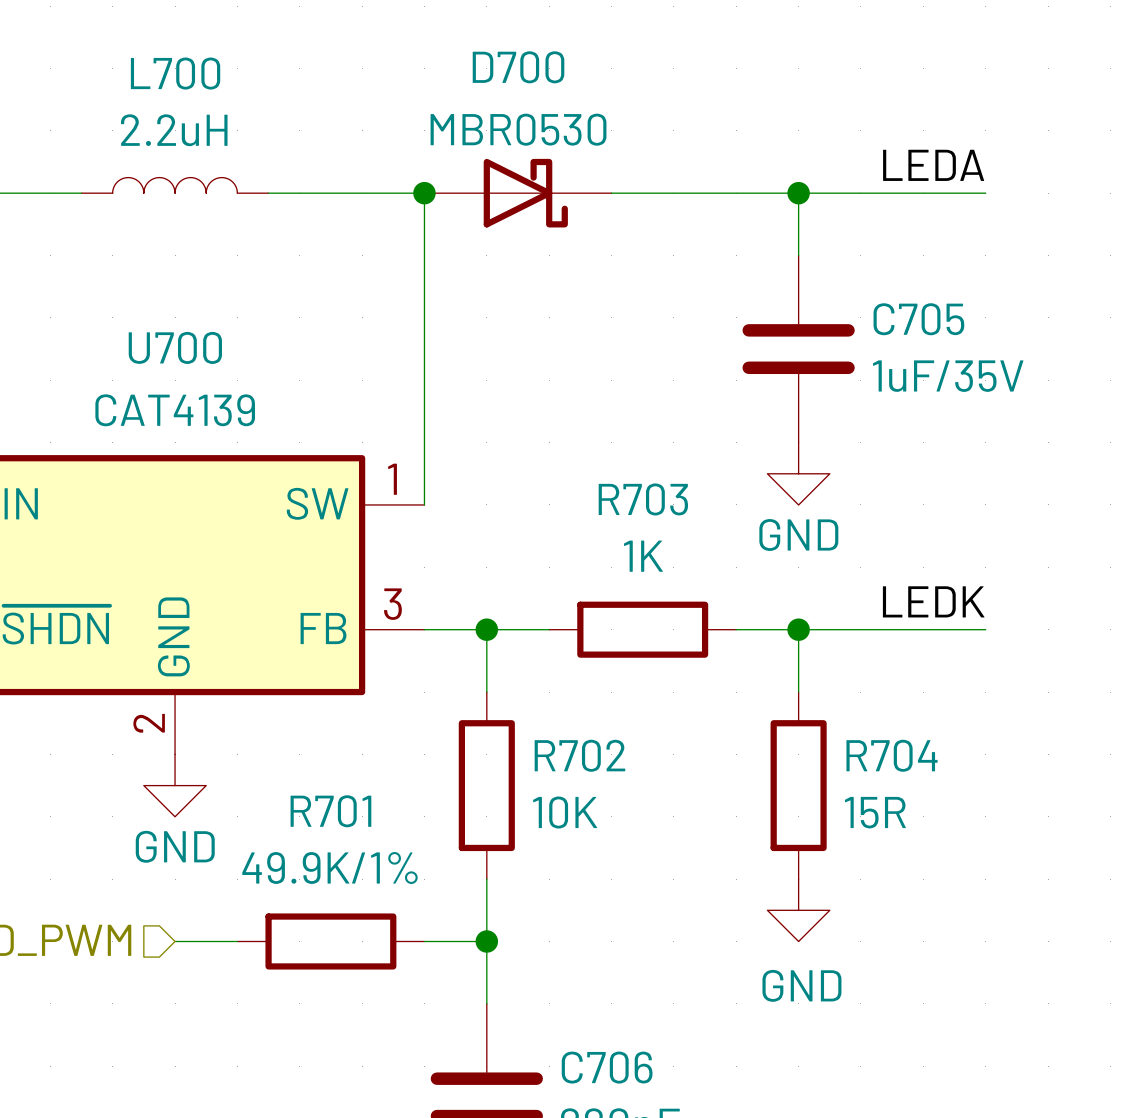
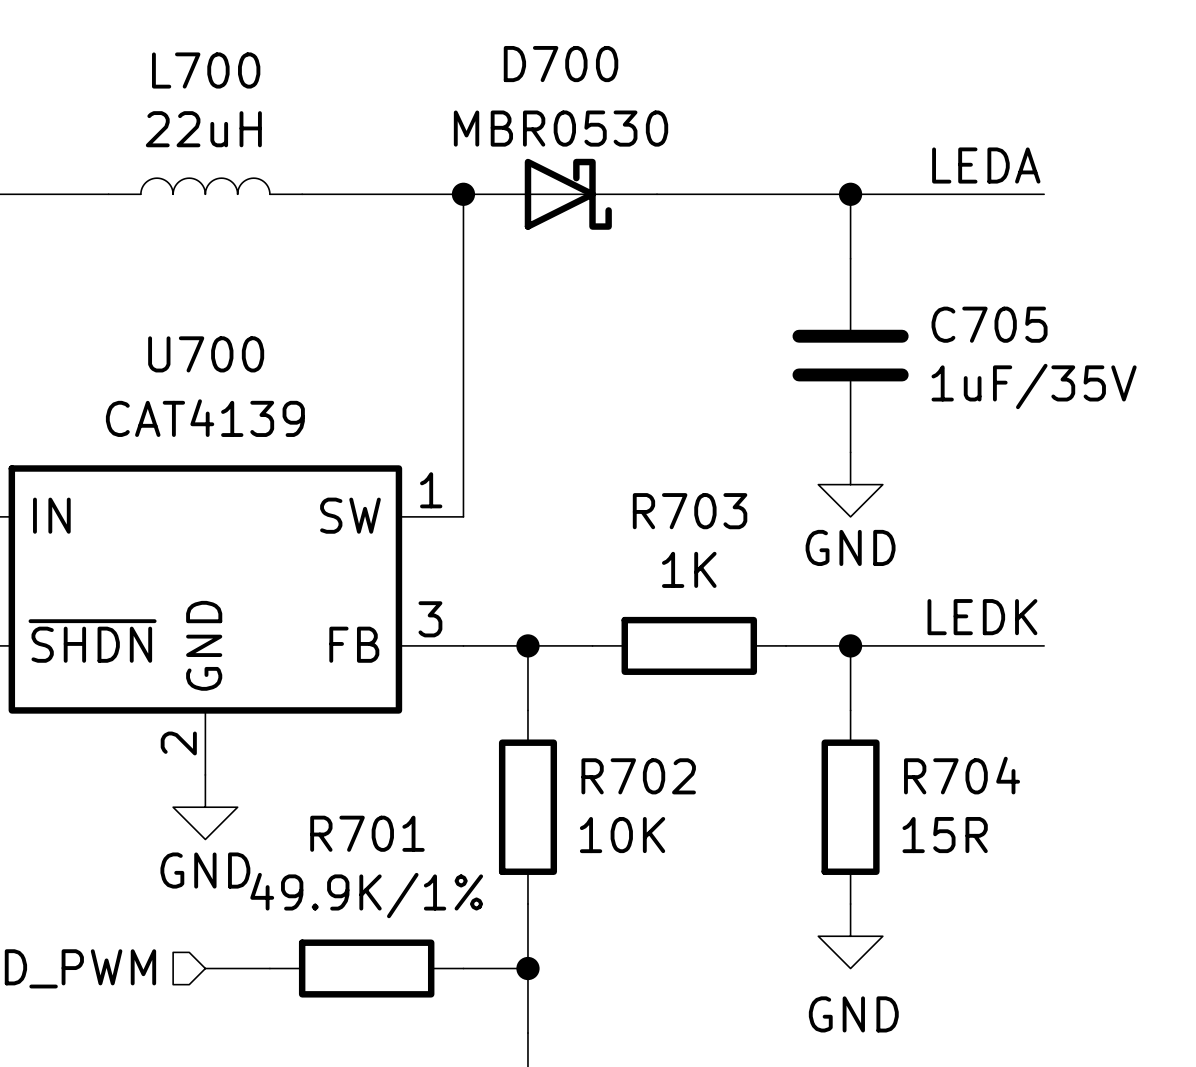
L700 value: 2.2uH (174, 130) -> 22uH (203, 129)

